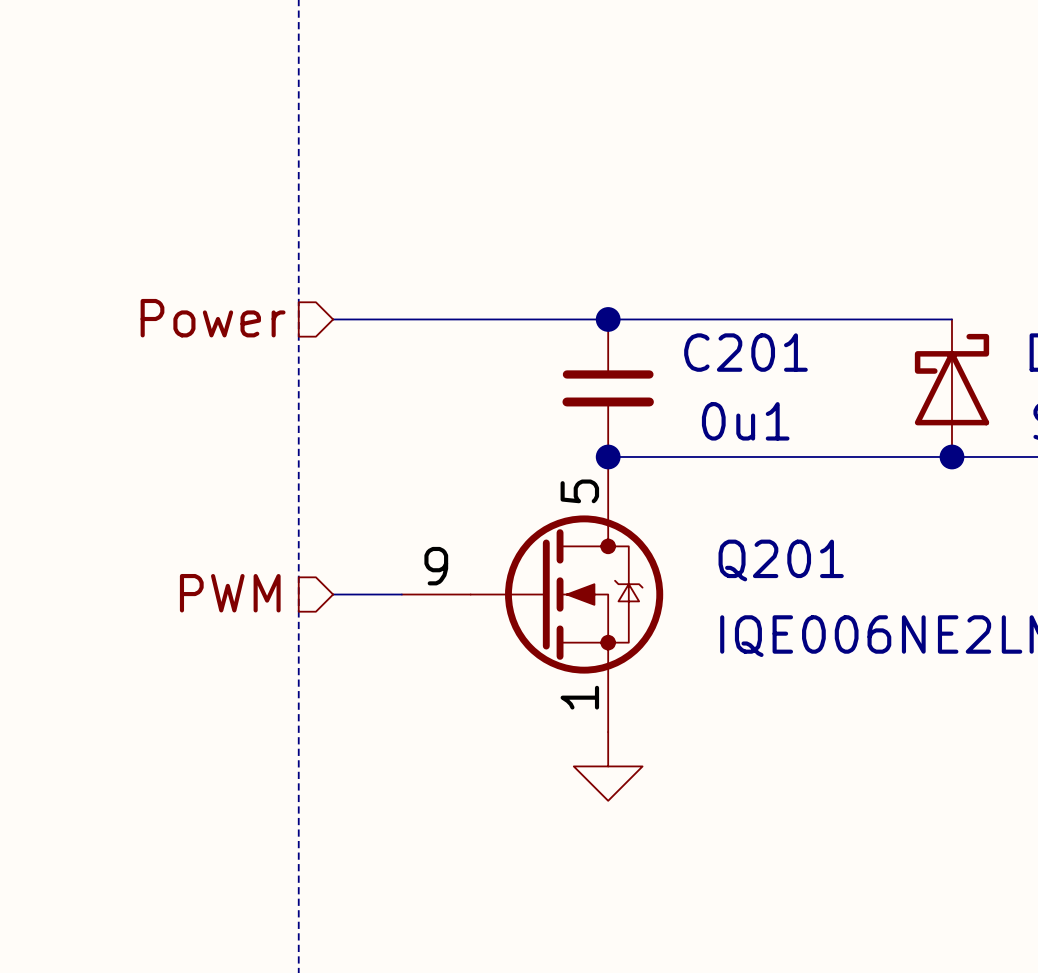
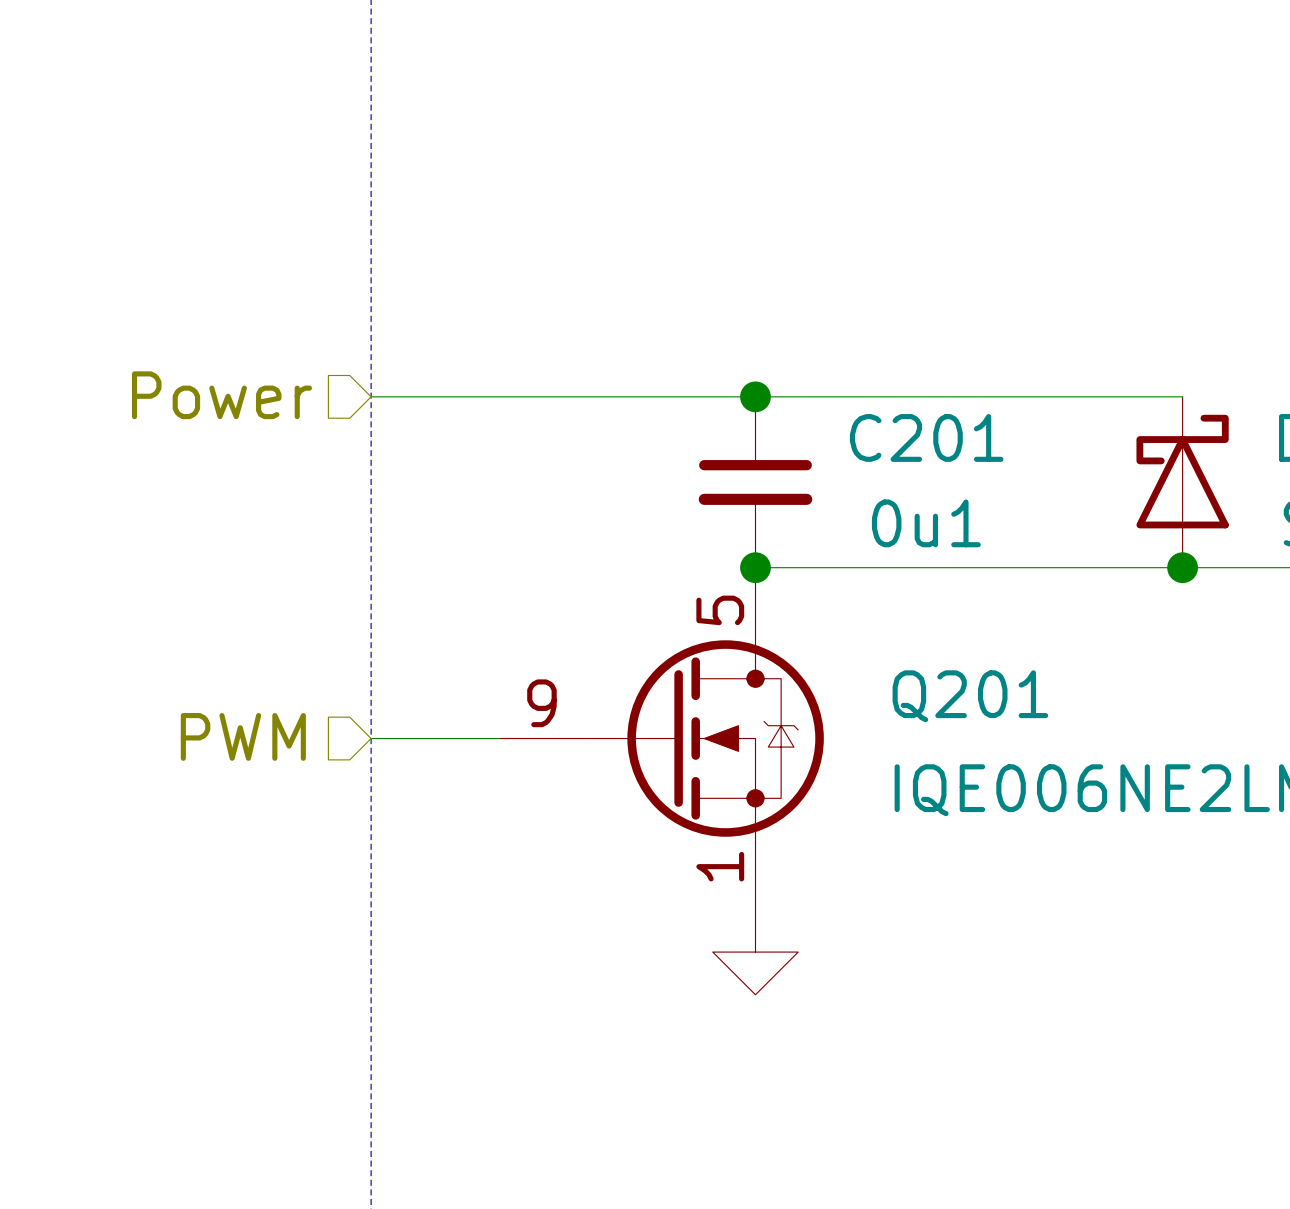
hierarchical label position: Power (213, 318) -> Power (221, 395)
wire: none -> (371, 396) (413, 396)
hierarchical label position: PWM (230, 593) -> PWM (243, 736)
wire: none -> (371, 738) (413, 738)

